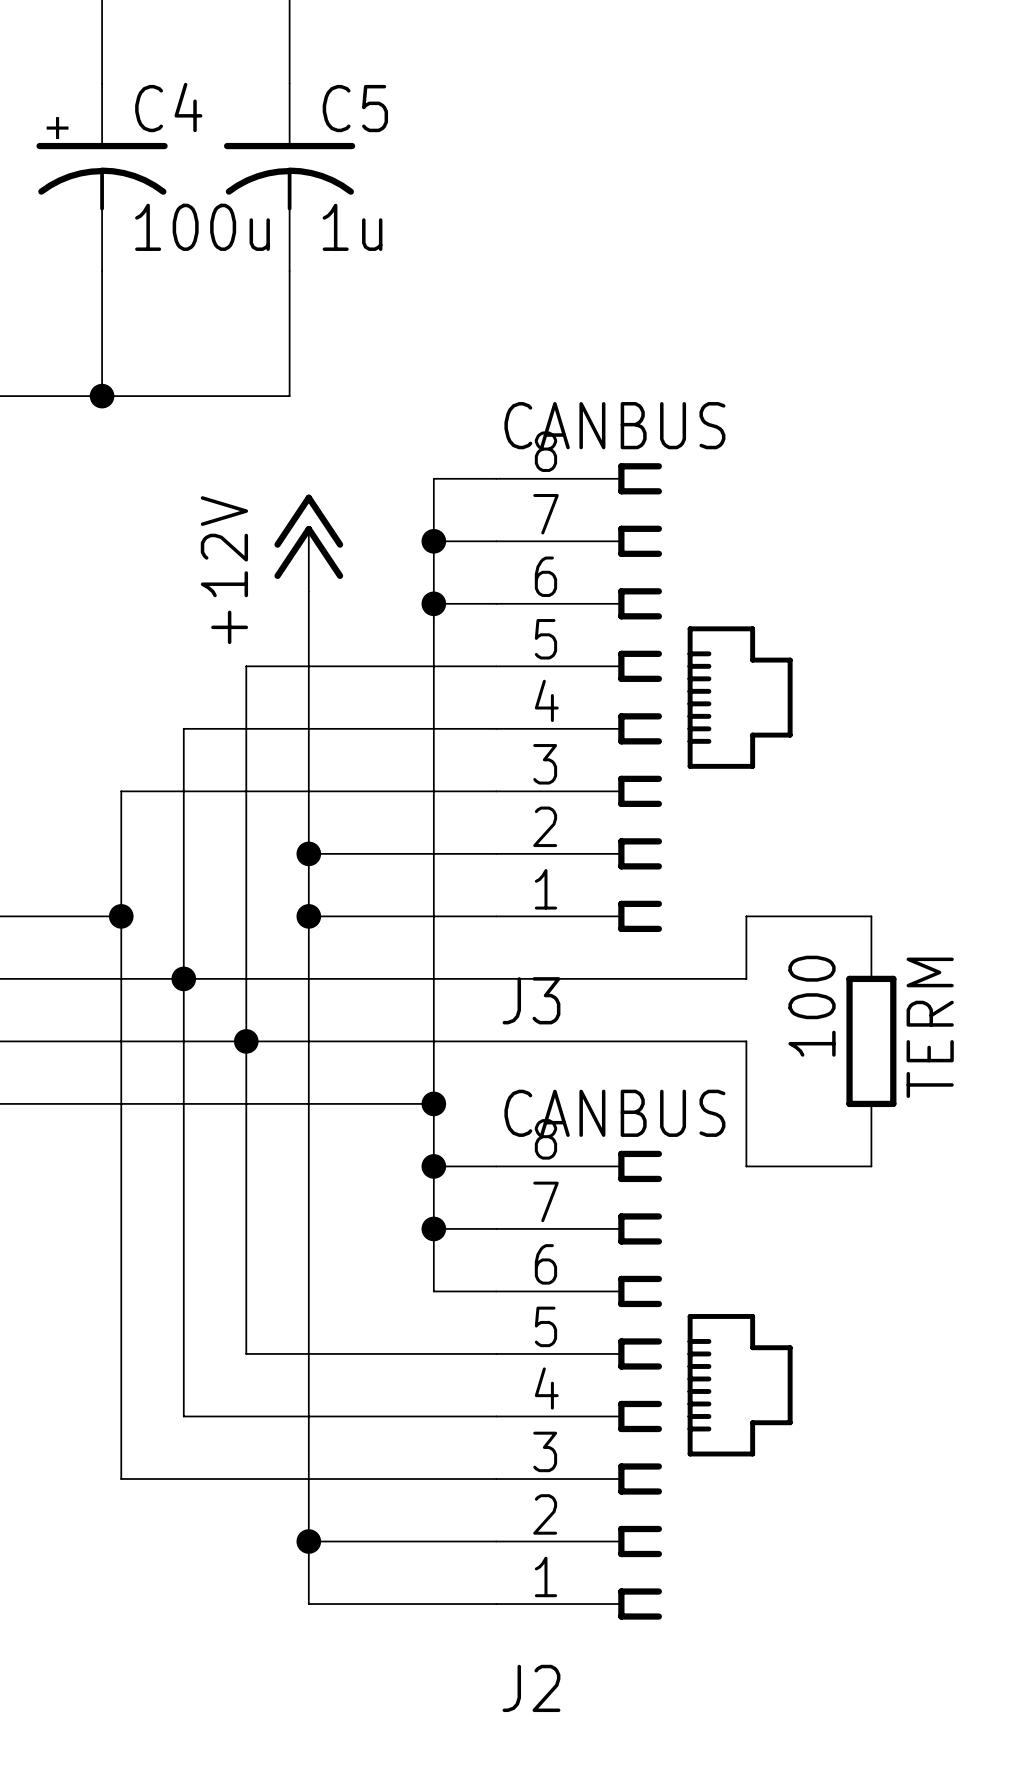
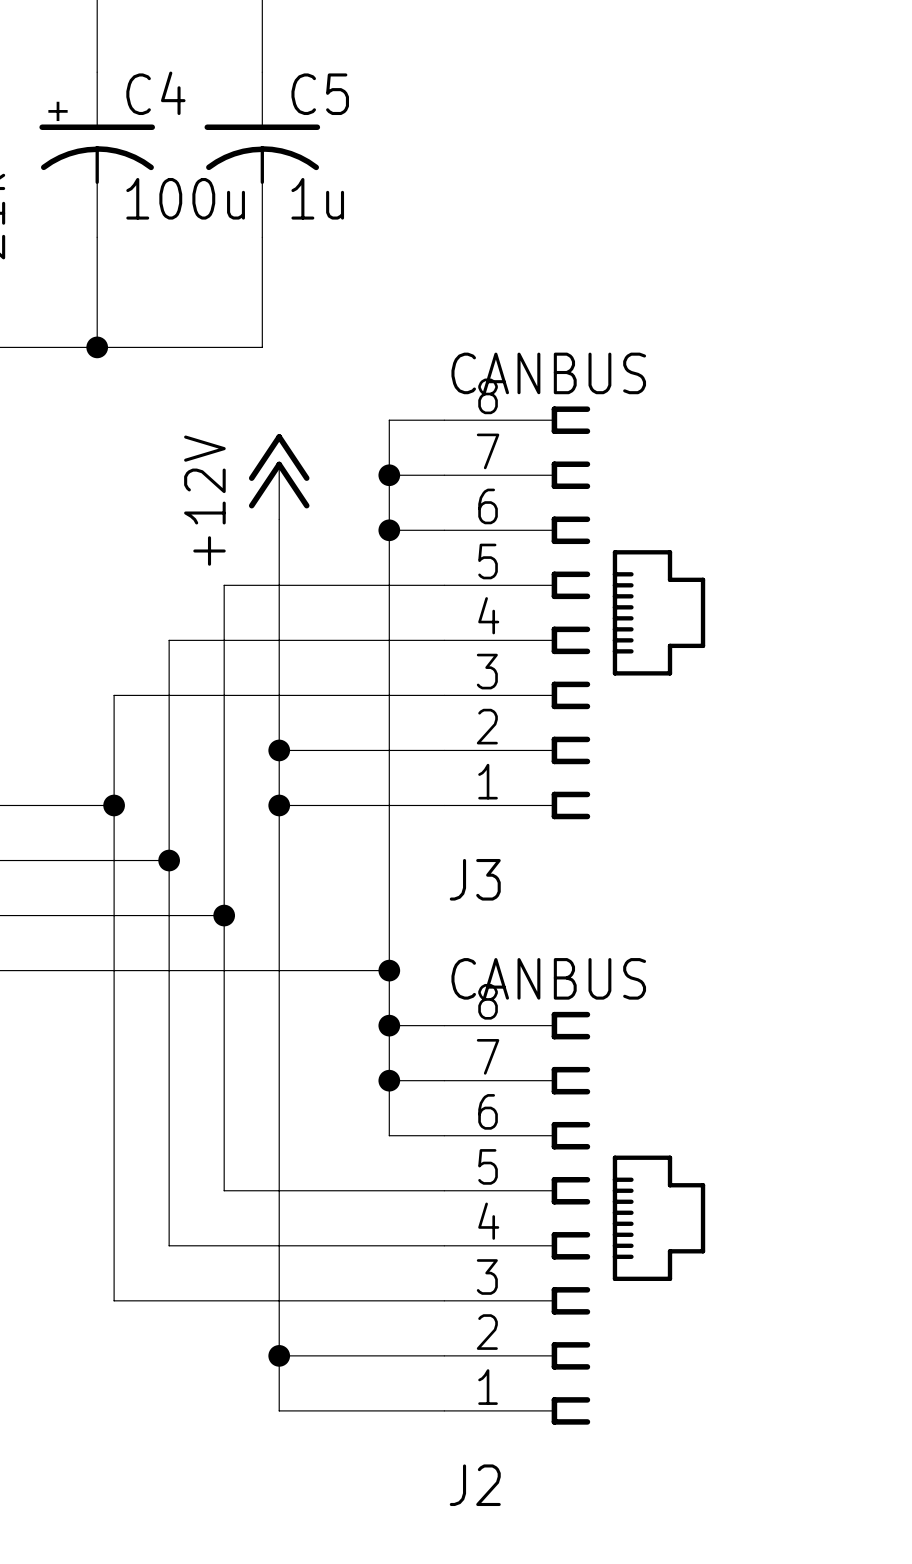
wire: (871, 916) (746, 916) (746, 978) (183, 978) -> none
wire: (246, 1041) (746, 1041) (746, 1166) (871, 1166) -> none
TERM: 100 (871, 1041) -> none

